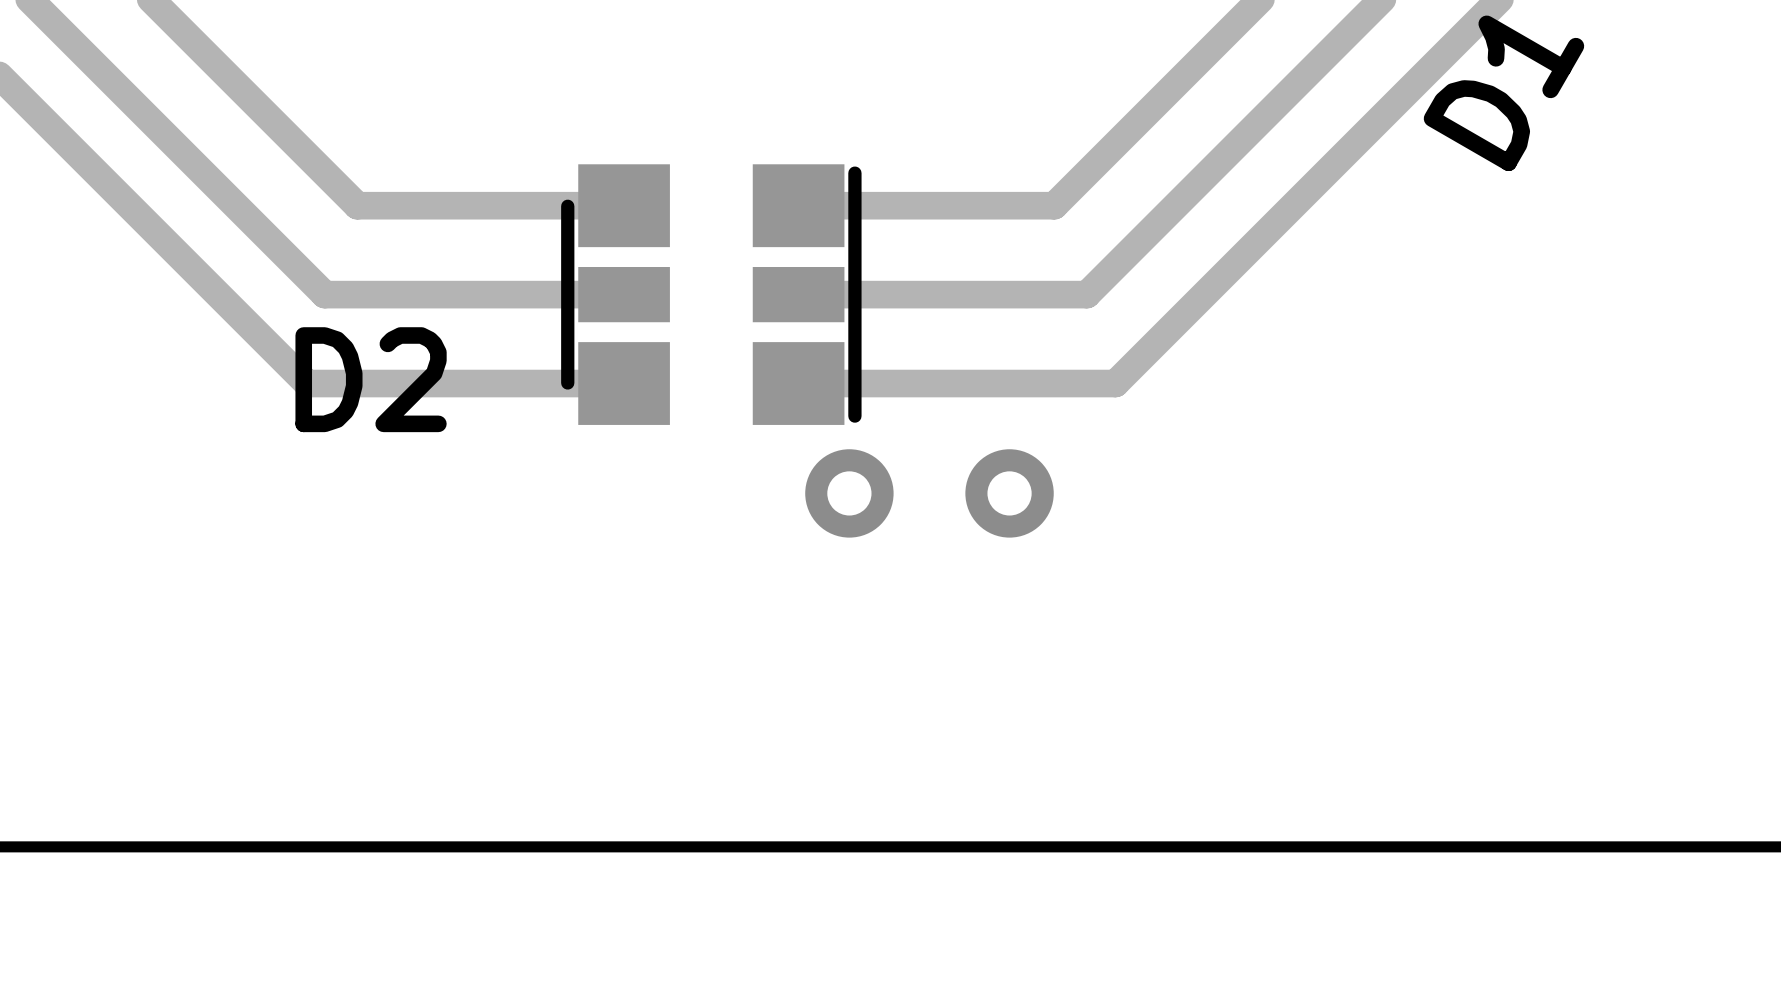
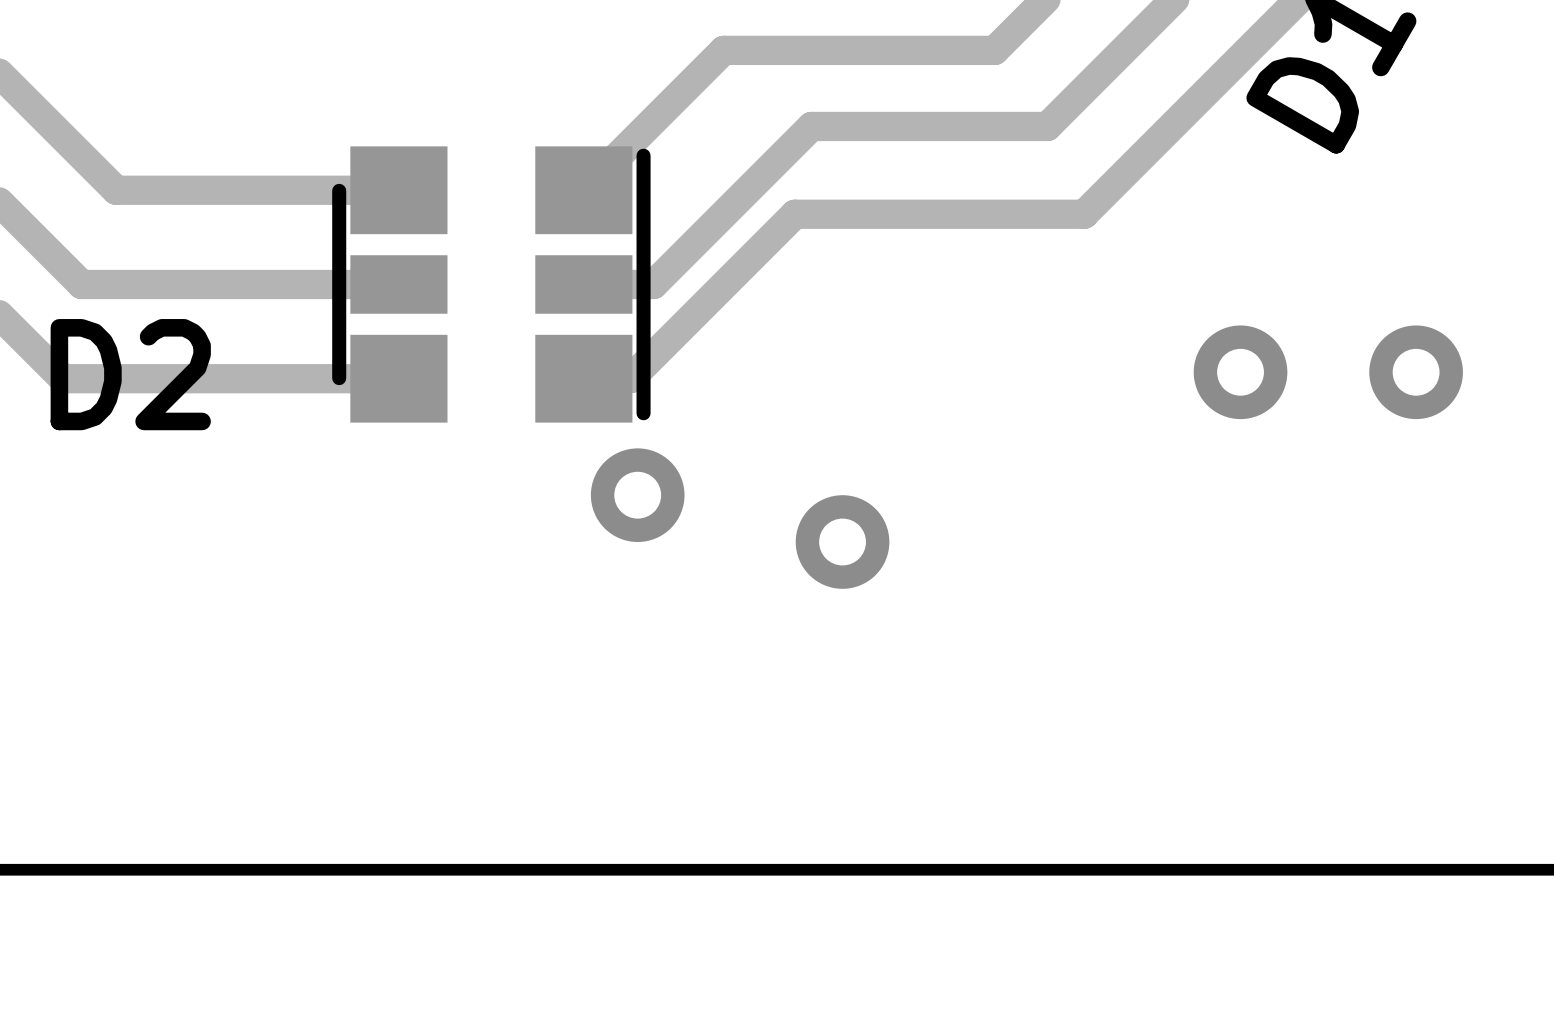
track: (1186, 73) (1054, 205) (798, 205) -> (994, 50) (723, 50) (583, 190)
track: (1235, 145) (1086, 294) (864, 294) -> (1047, 126) (811, 126) (653, 284)
track: (1270, 228) (1115, 383) (842, 383) -> (1084, 214) (794, 214) (630, 378)
via: none -> (1240, 372)
via: none -> (1416, 372)
via position: (1009, 493) -> (842, 542)

